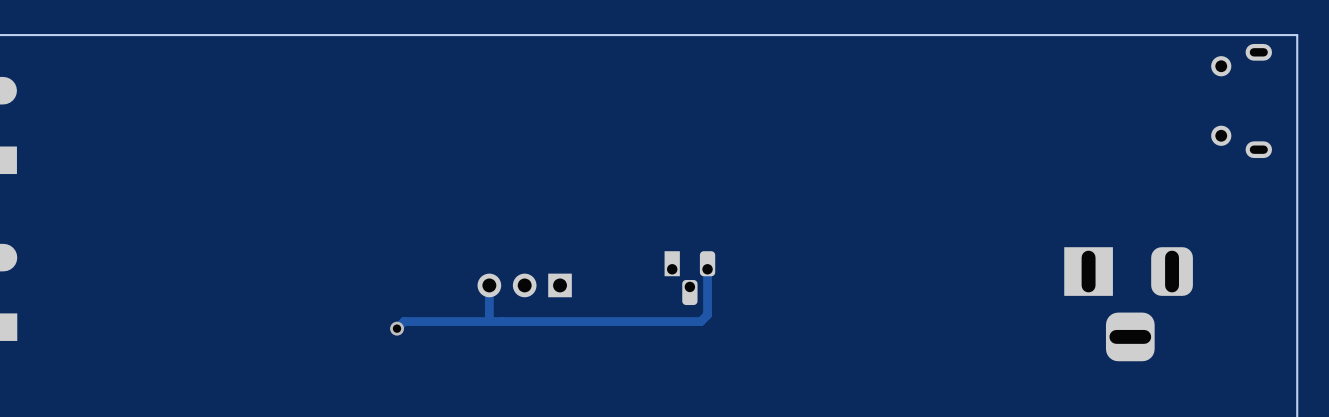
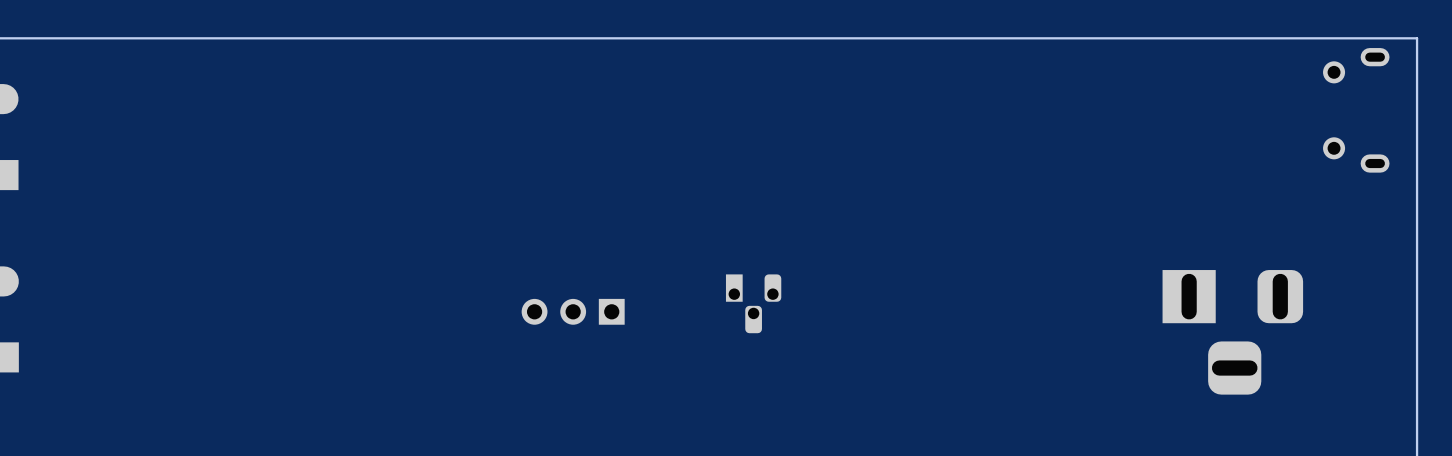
track: (707, 269) (707, 314) (700, 321) (404, 321) (397, 328) -> none
track: (489, 285) (488, 321) -> none
via: (397, 328) -> none

